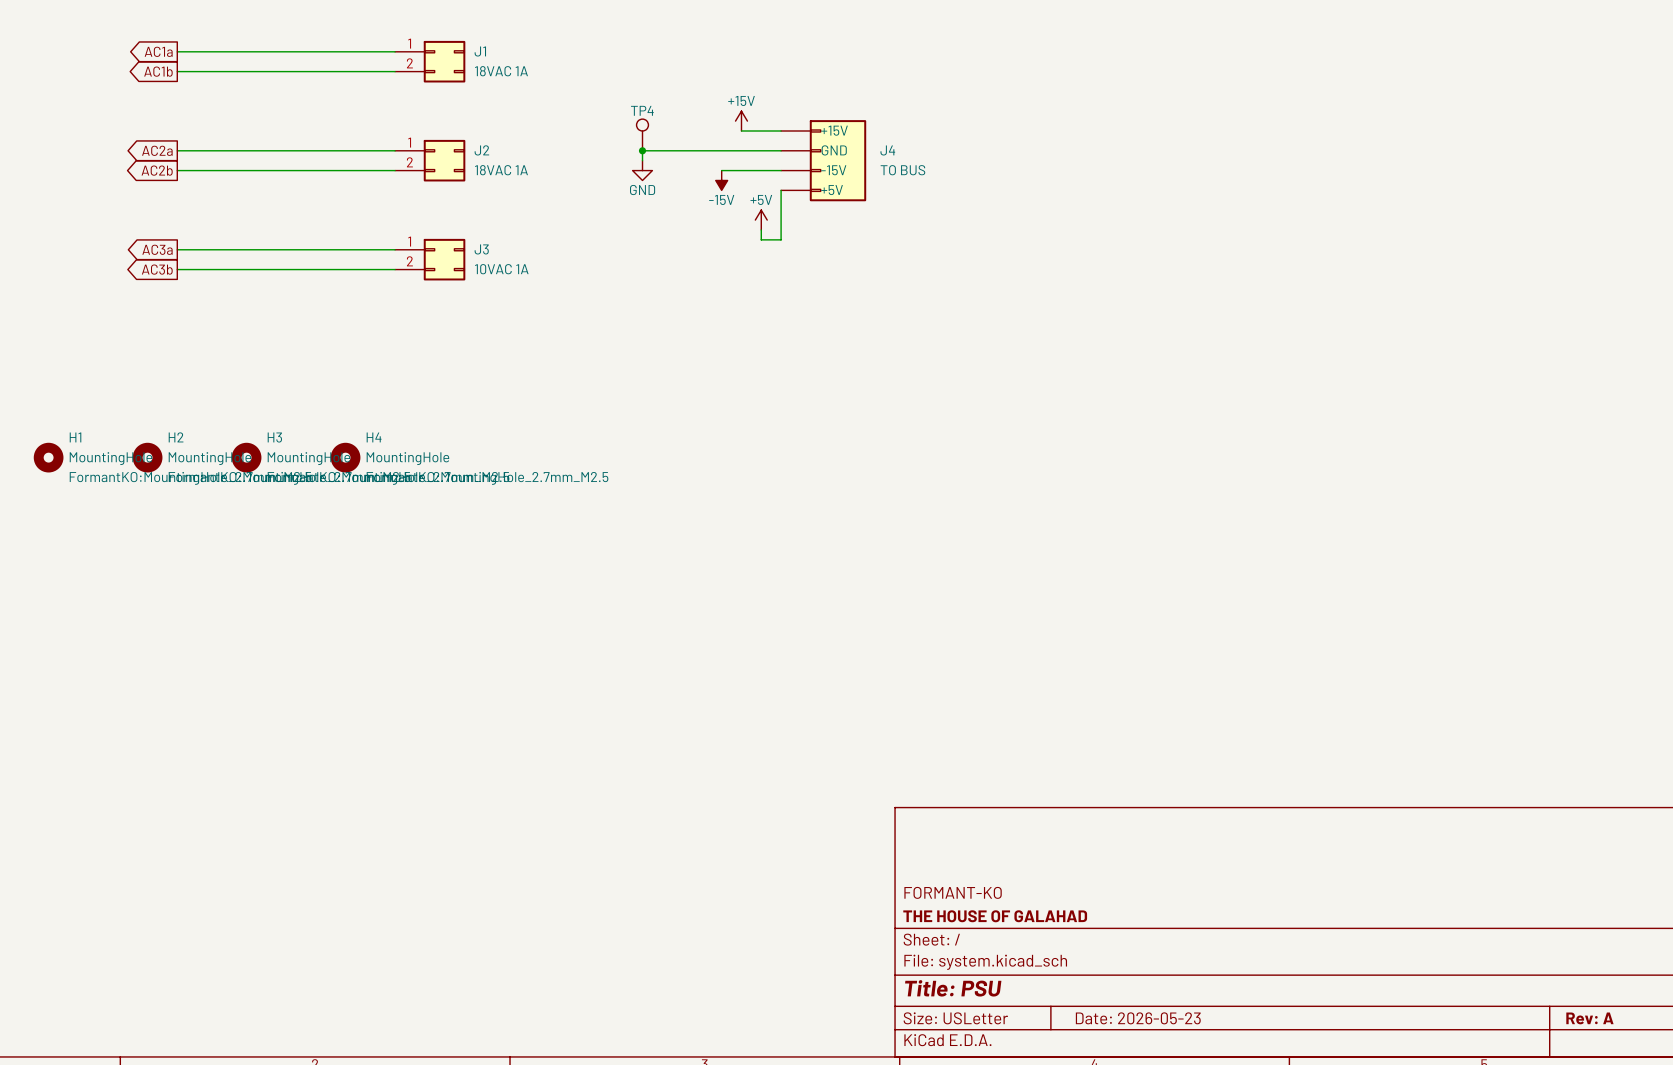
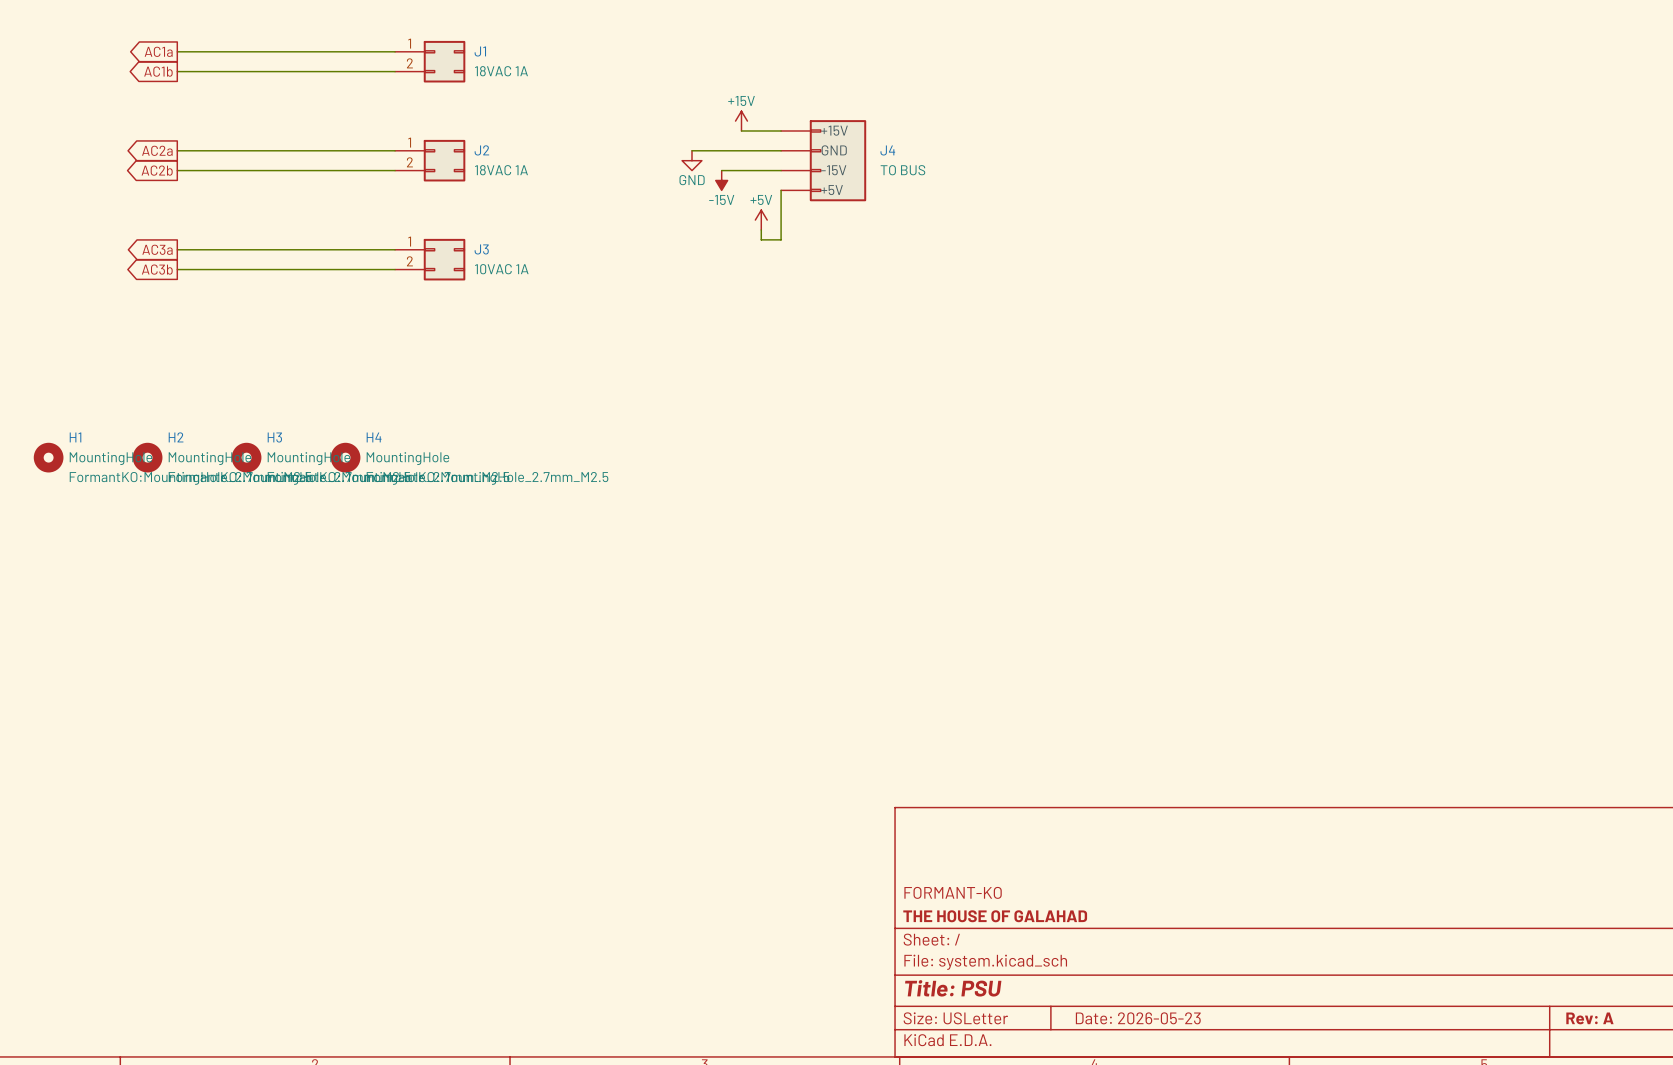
TP4: (642, 134) -> none
junction: (642, 150) -> none
wire: (691, 150) (642, 150) (642, 160) -> none
power symbol position: GND (642, 170) -> GND (691, 160)

